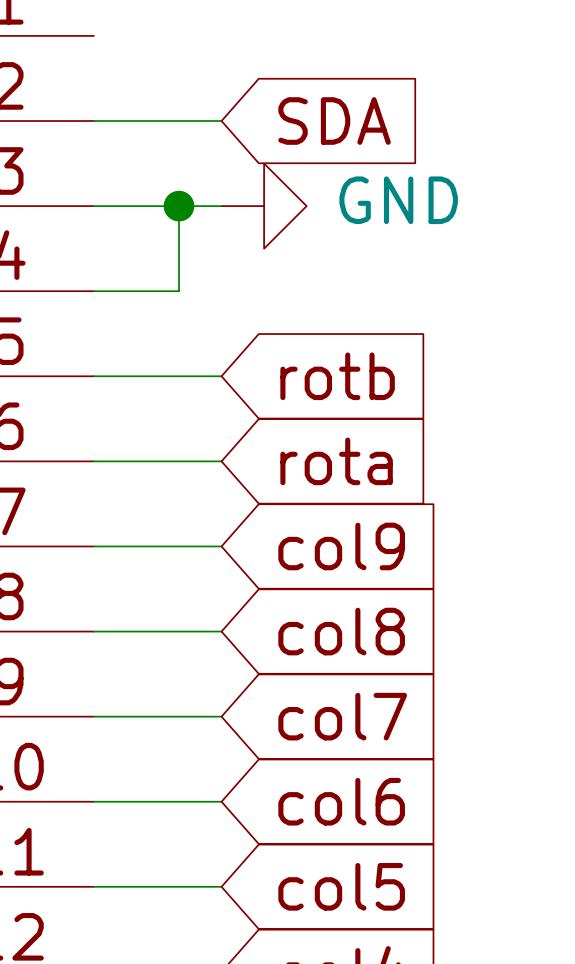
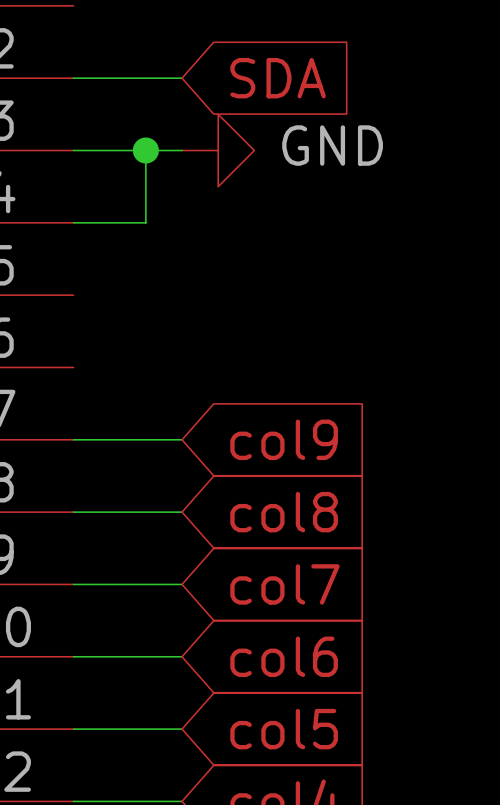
wire: (93, 376) (221, 376) -> none
global label: rotb (337, 376) -> none
wire: (93, 461) (221, 461) -> none
global label: rota (336, 461) -> none

